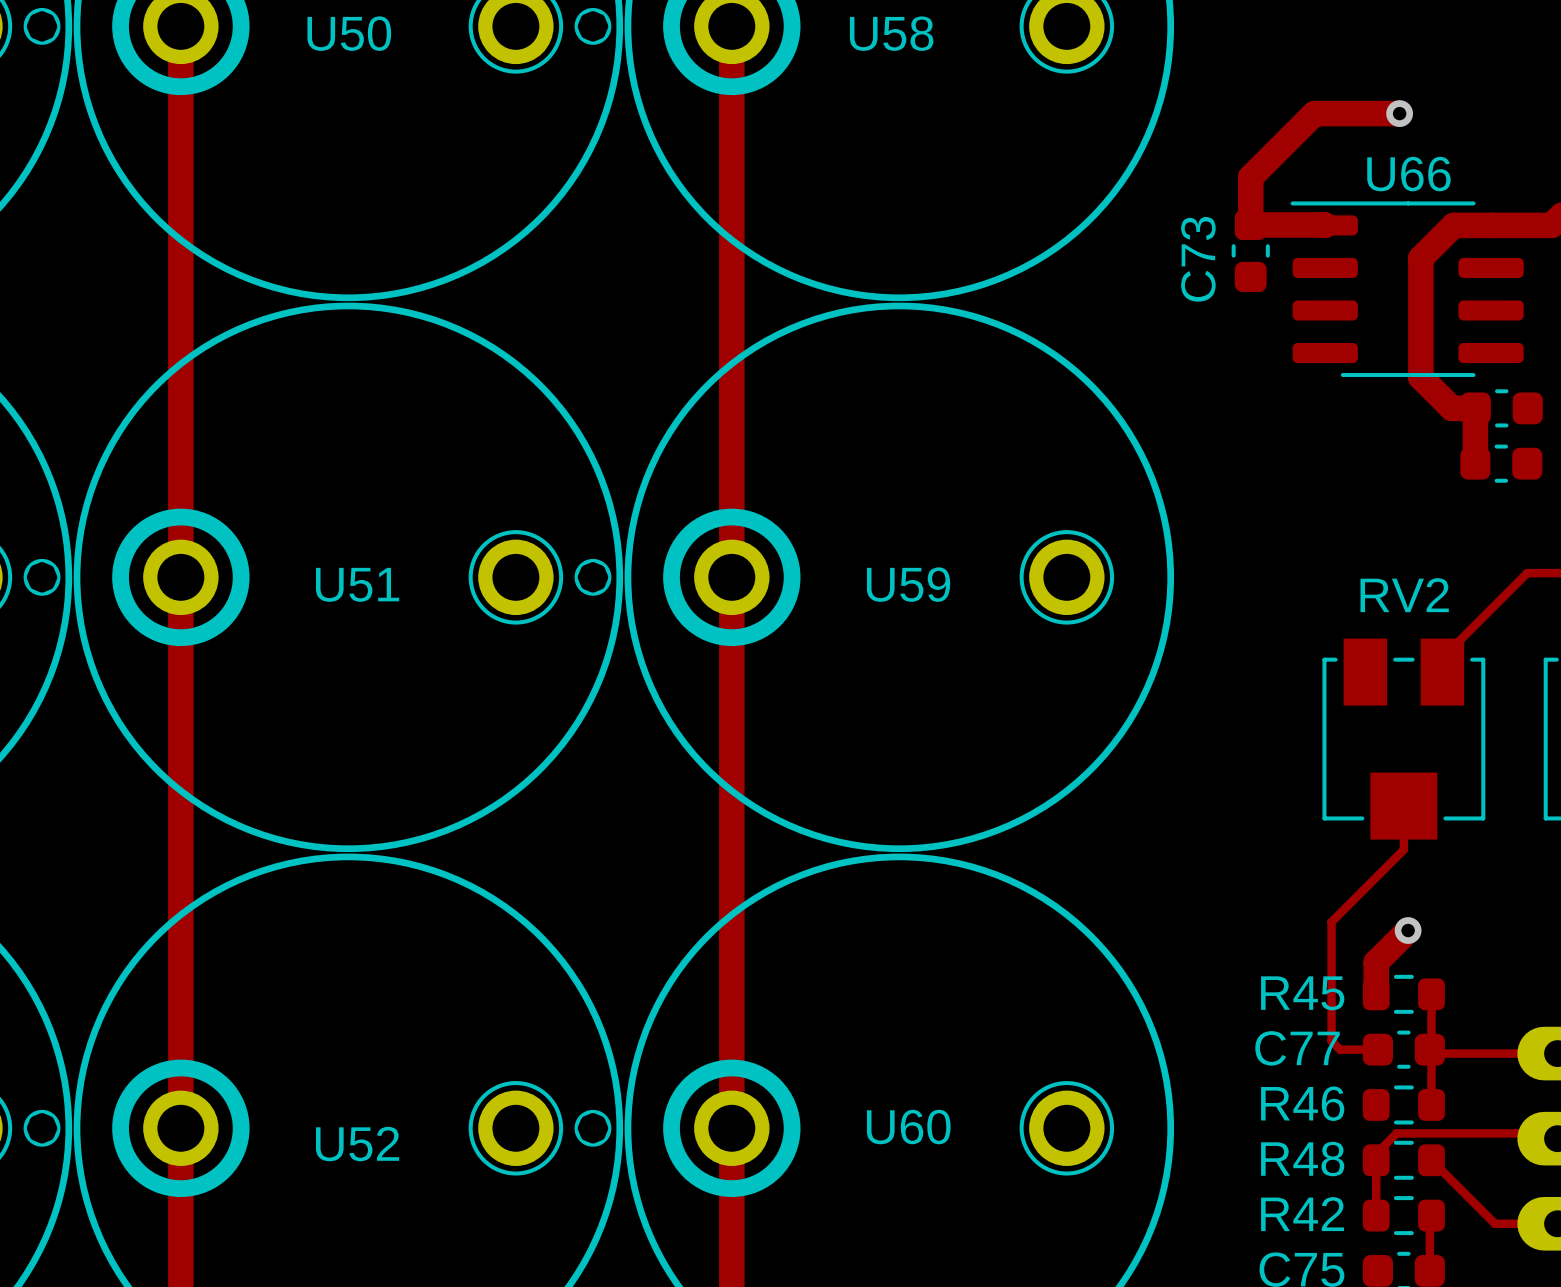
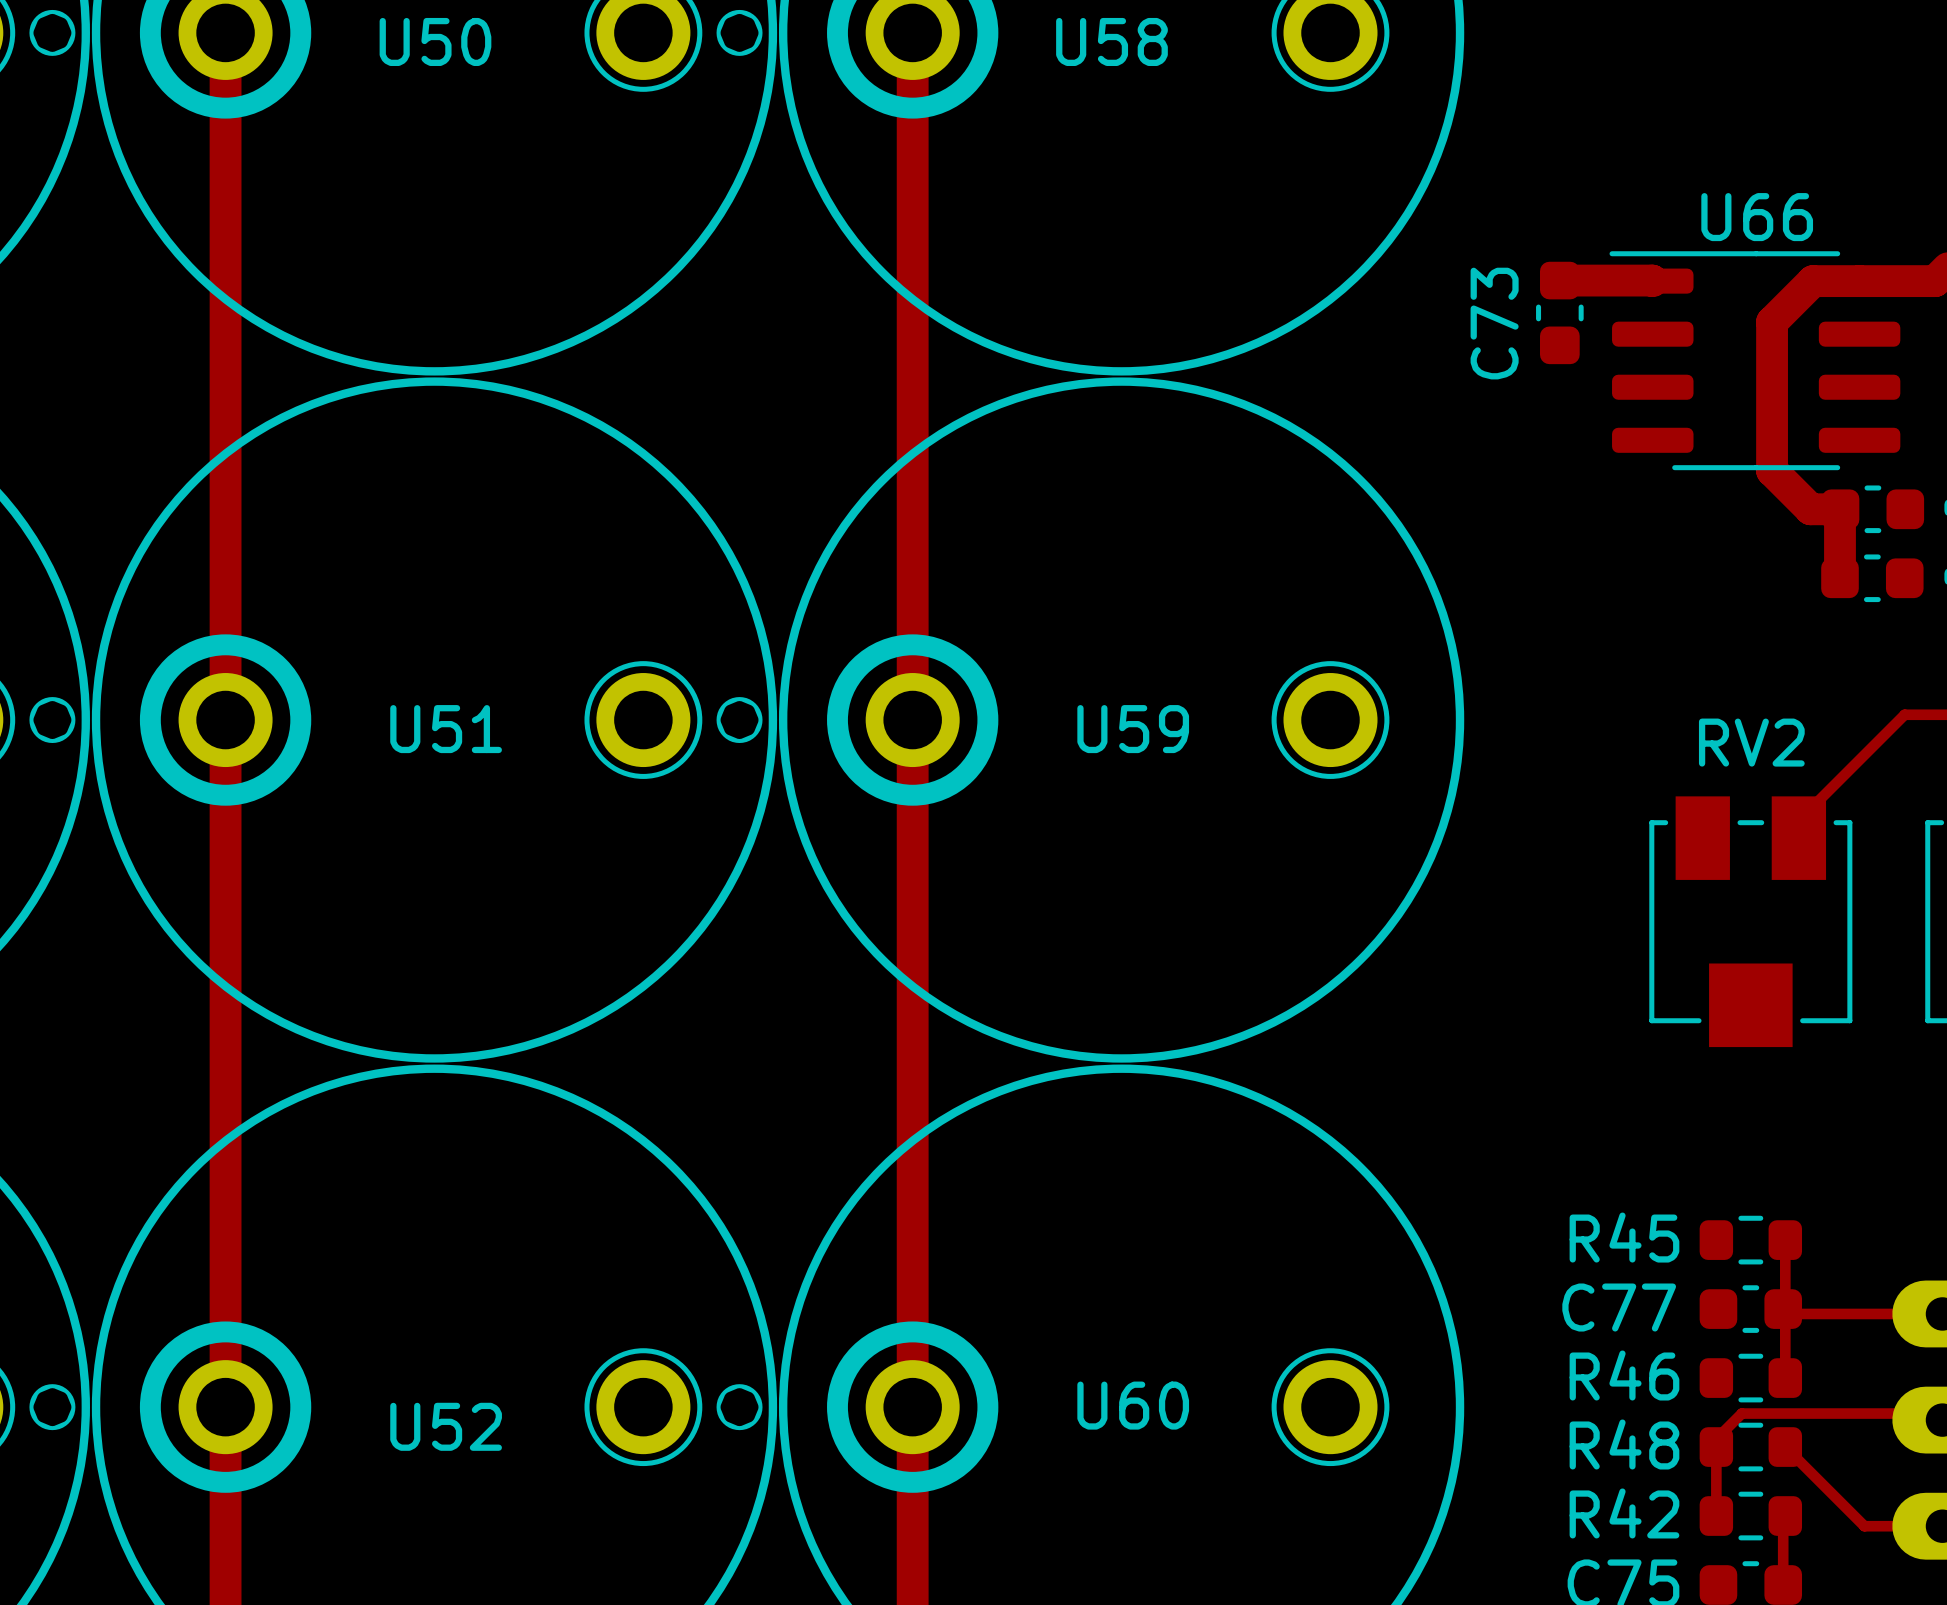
track: (1399, 113) (1314, 113) (1250, 177) (1250, 224) -> none
via: (1399, 113) -> none
track: (1403, 806) (1403, 849) (1331, 922) (1331, 1041) (1340, 1049) (1377, 1049) -> none
track: (1408, 930) (1376, 962) (1376, 994) -> none
via: (1408, 930) -> none

